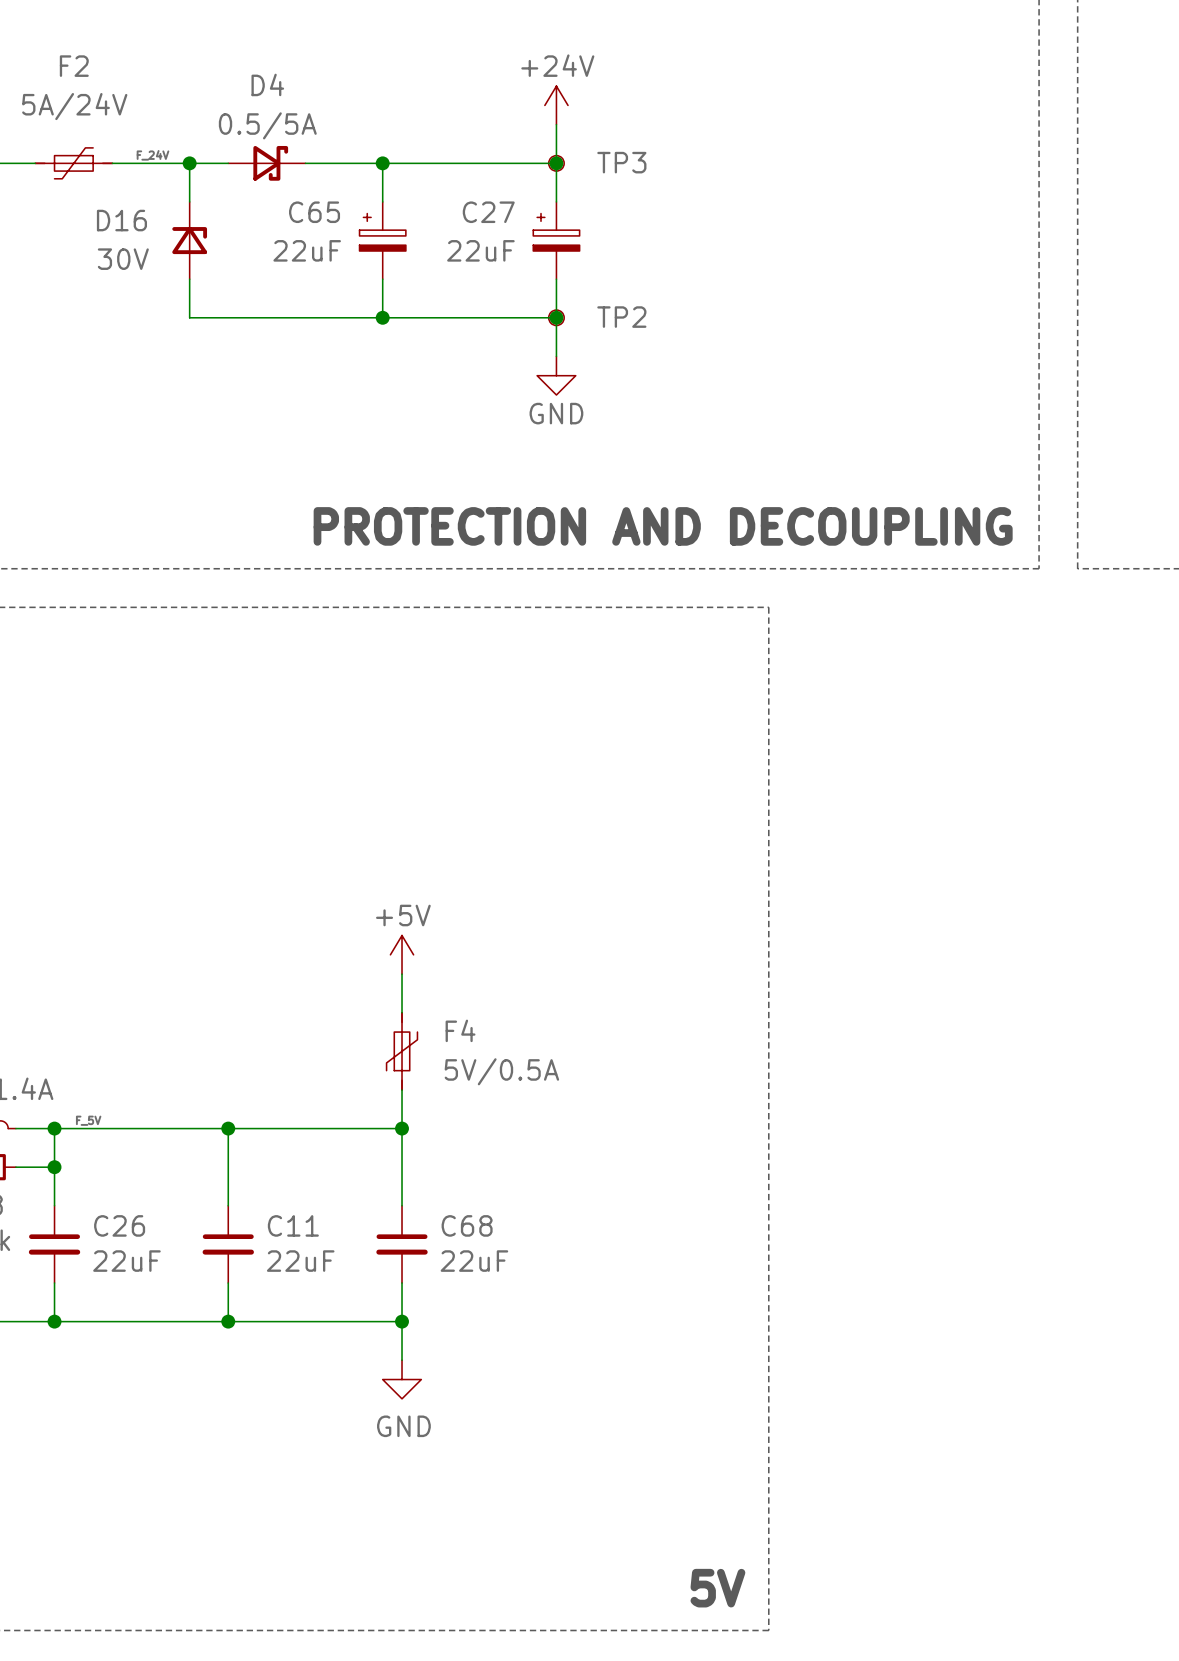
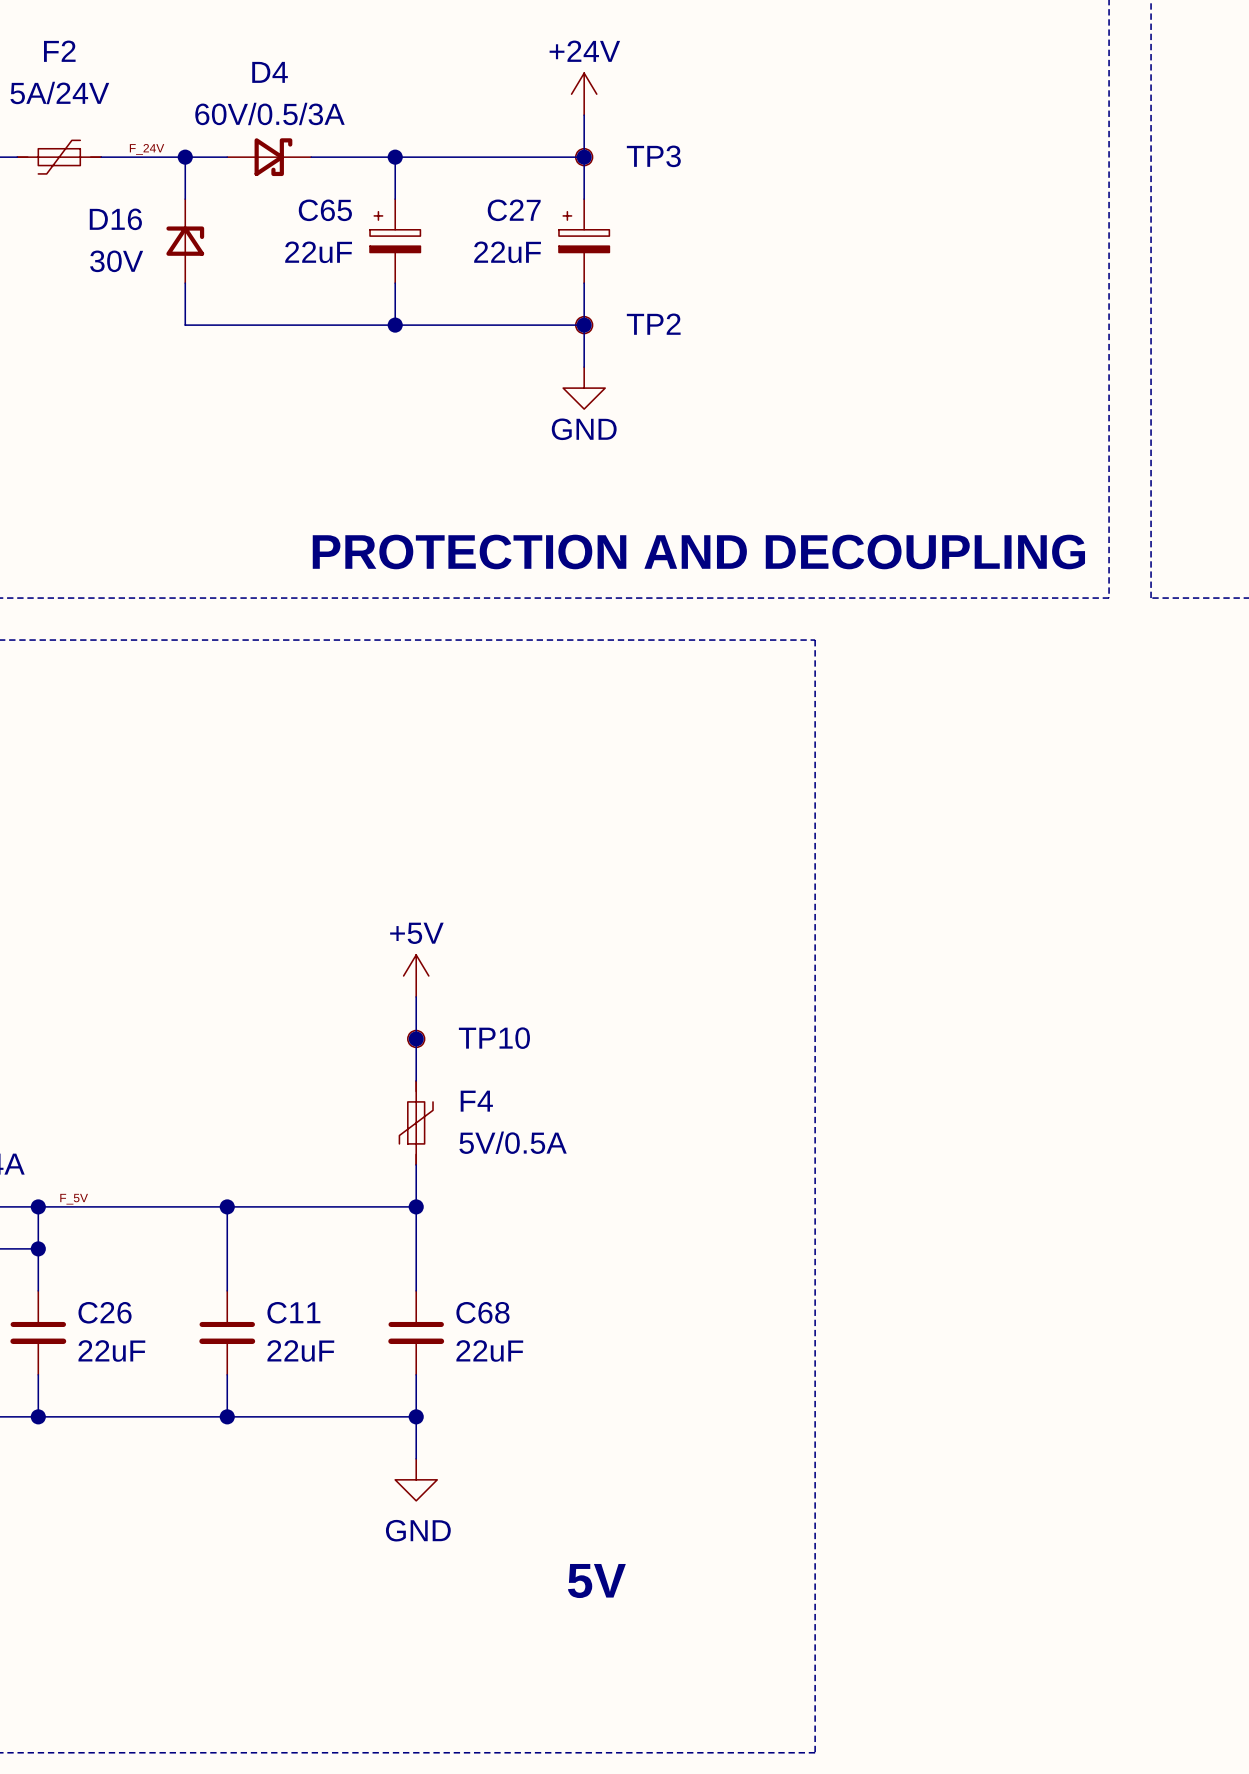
D4 value: 0.5/5A (267, 125) -> 60V/0.5/3A (269, 113)
power symbol position: +5V (402, 954) -> +5V (416, 975)
TP10: none -> (416, 1038)
junction: none -> (416, 1038)
text position: 5V (717, 1588) -> 5V (596, 1581)

